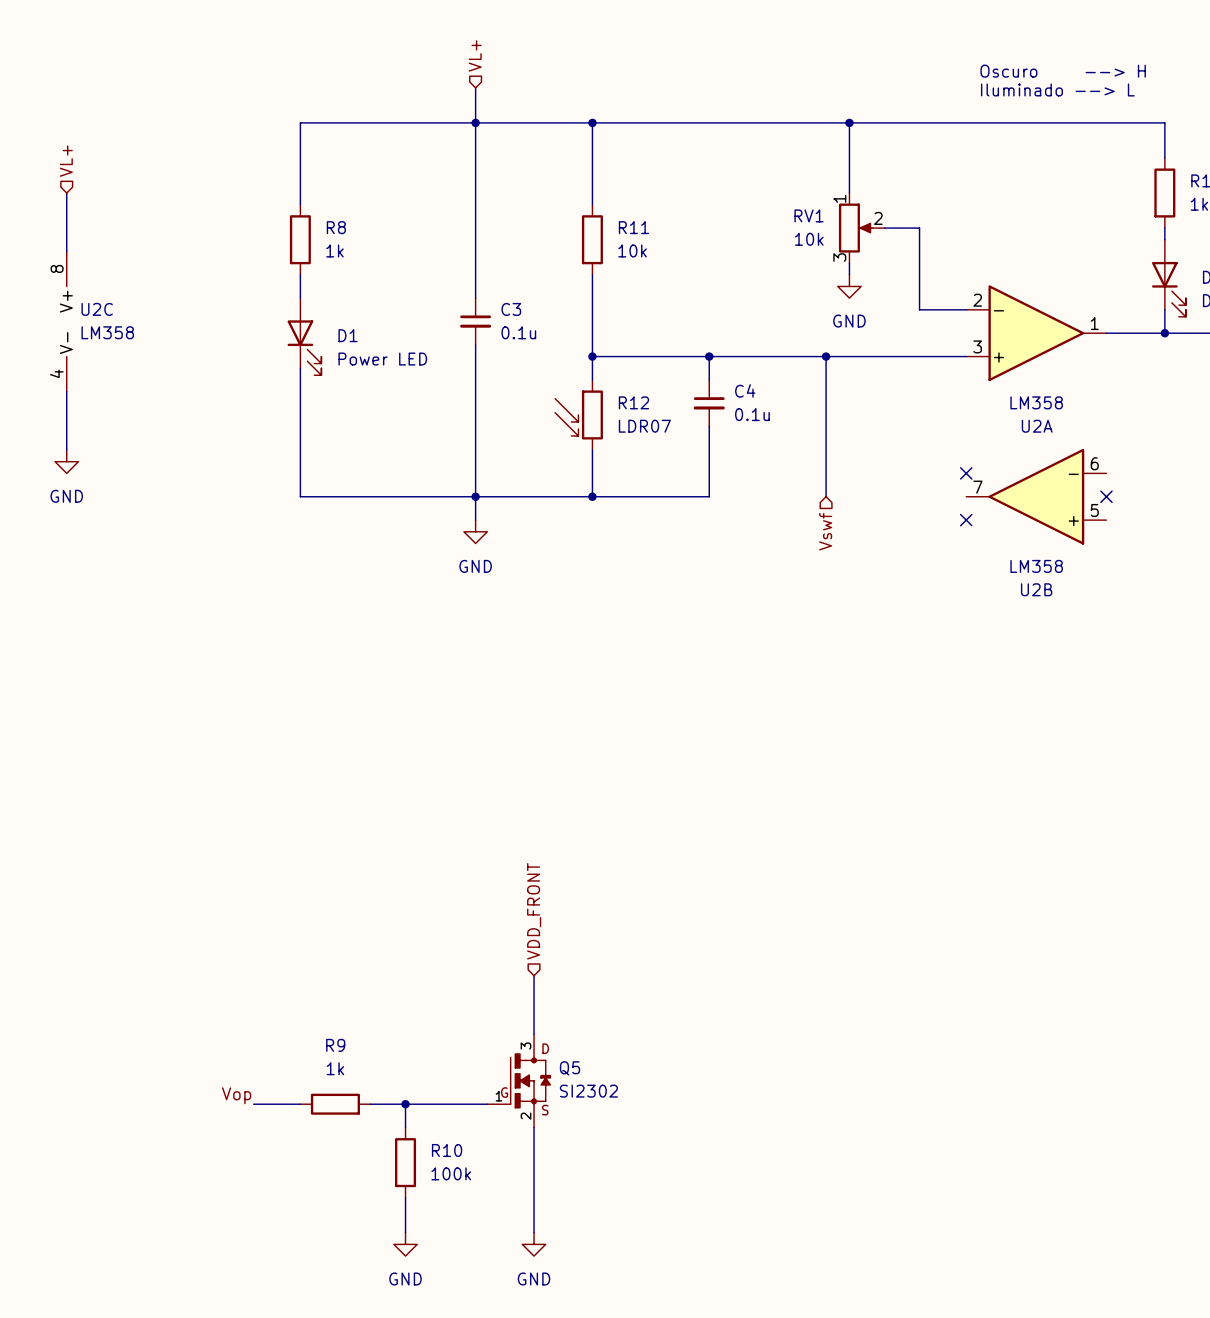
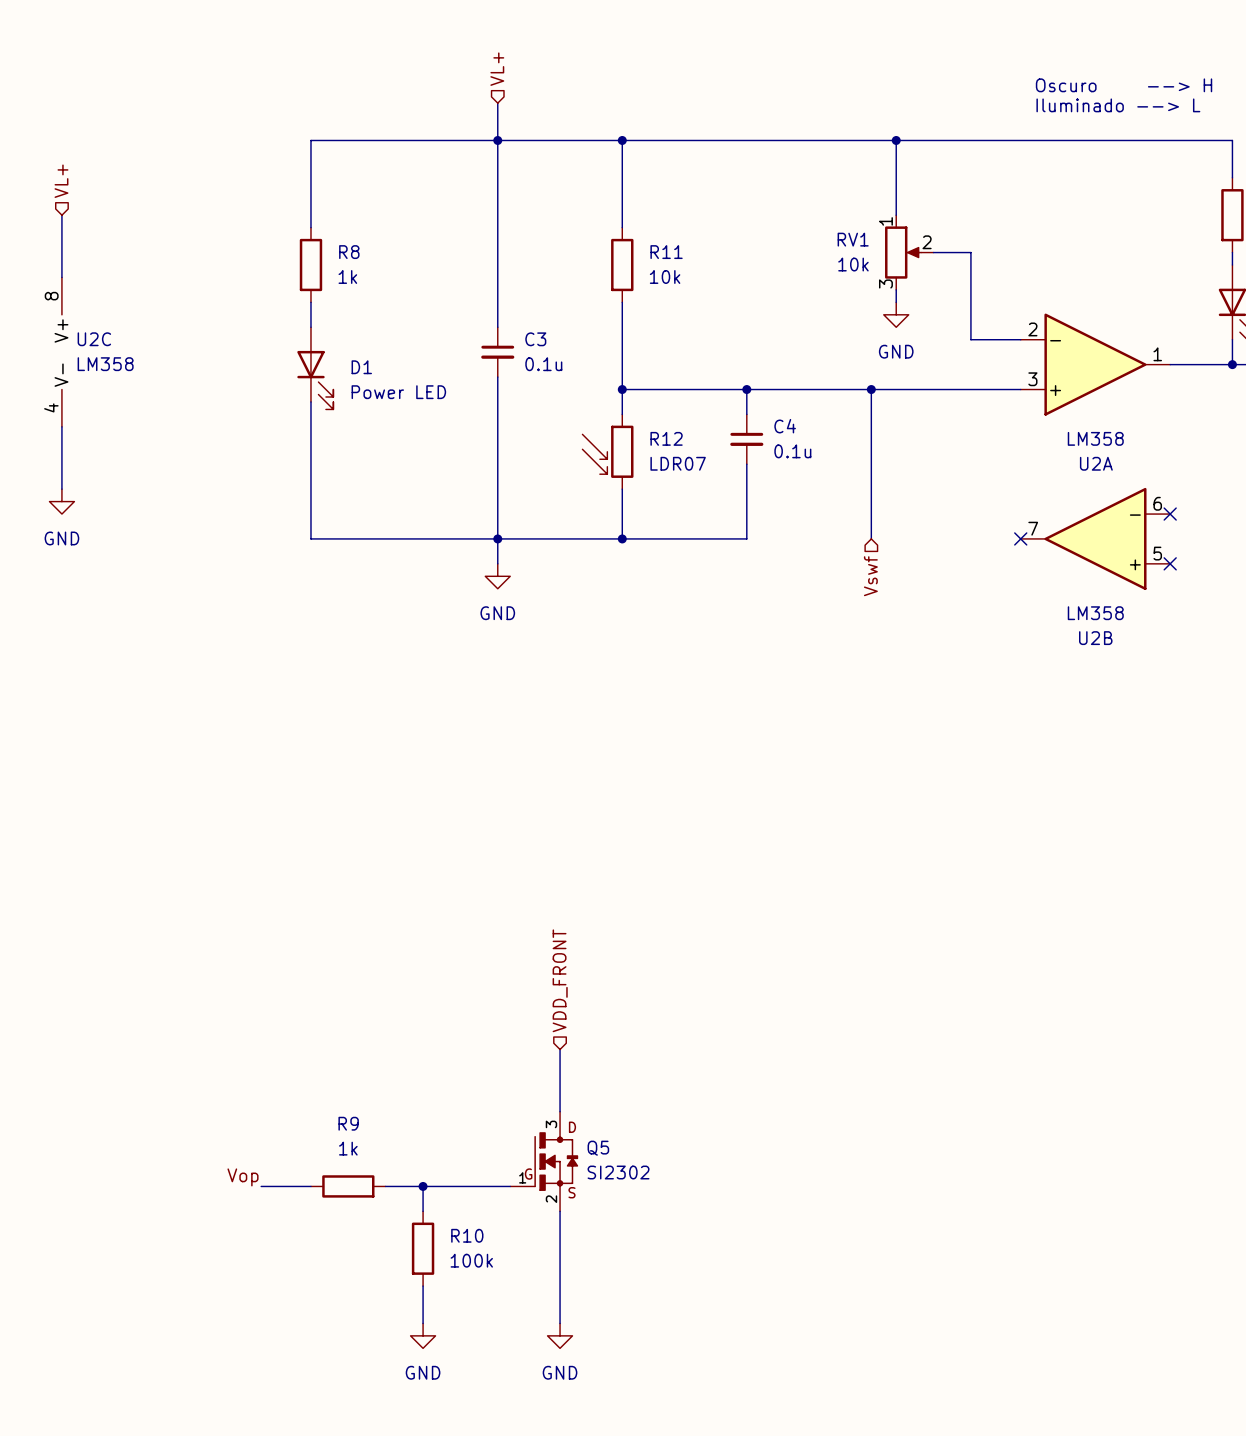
no-connect mark: (966, 473) -> none
no-connect mark: none -> (1170, 514)
no-connect mark: none -> (1020, 538)
no-connect mark: (1106, 496) -> none
no-connect mark: (966, 520) -> none
no-connect mark: none -> (1170, 563)

